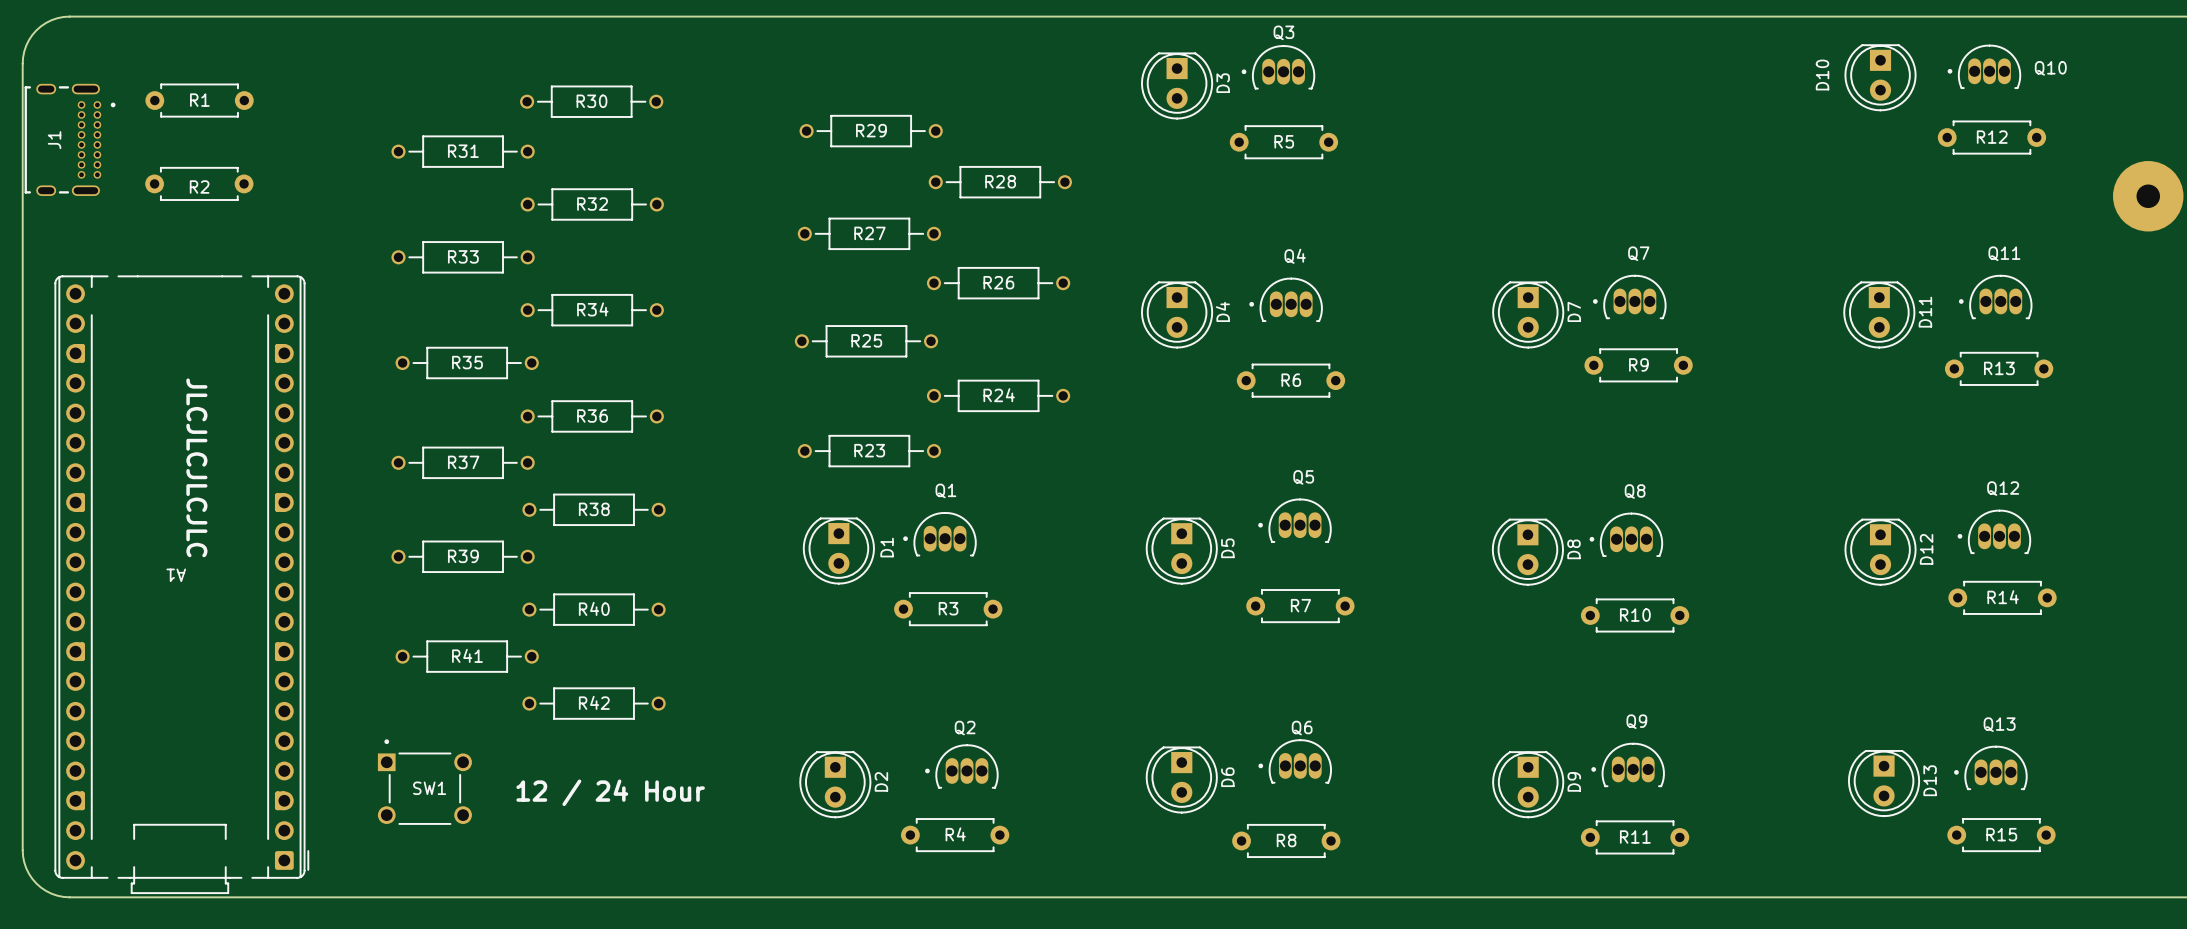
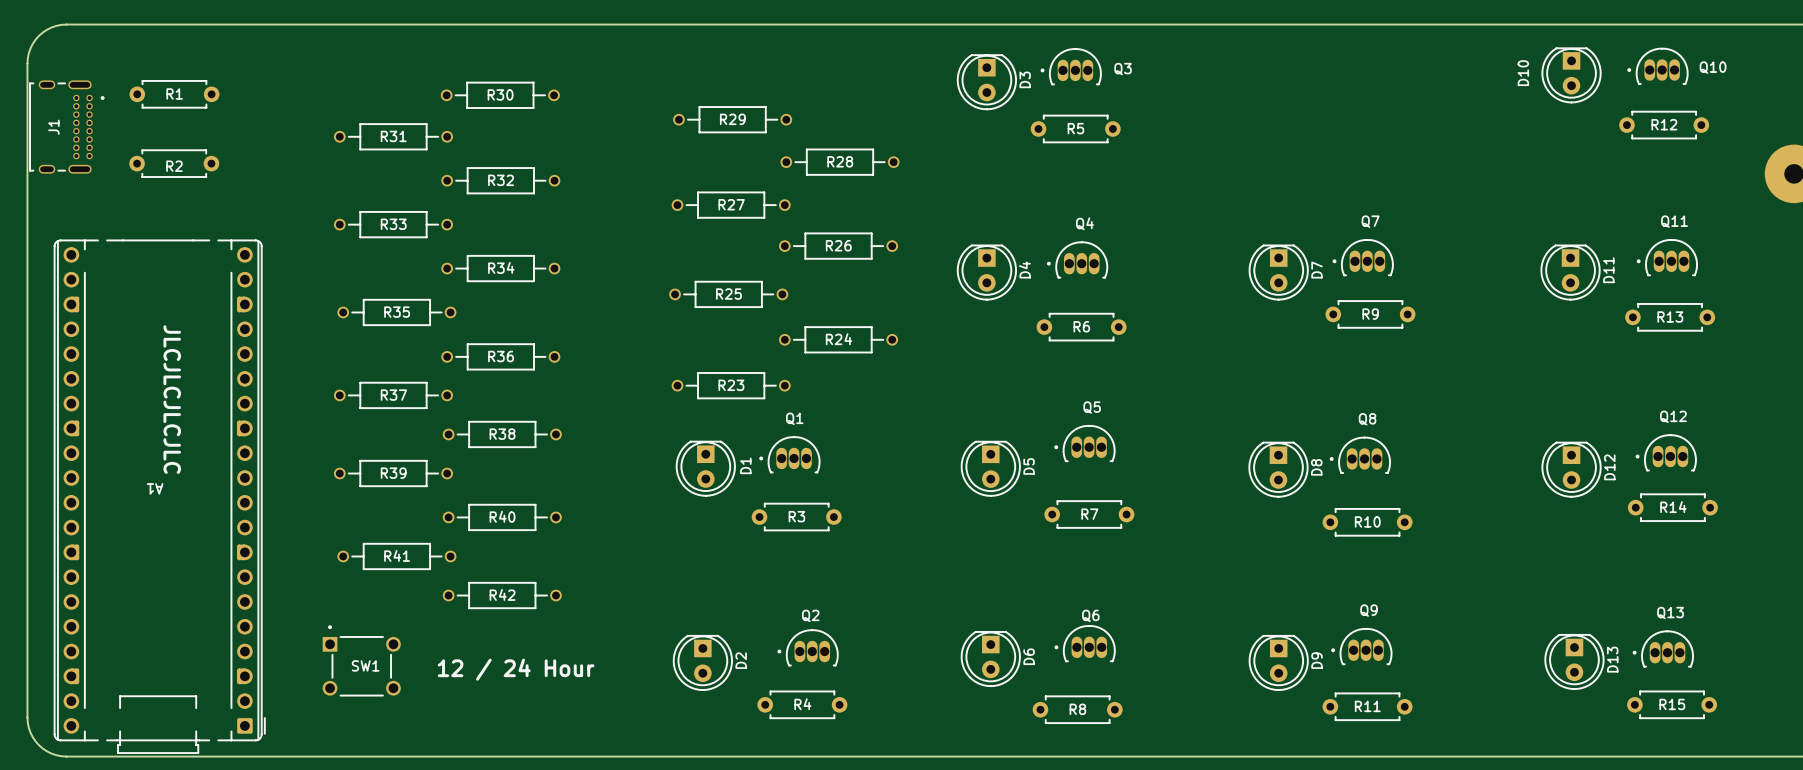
Q3 name position: Q3 (1283, 32) -> Q3 (1123, 69)

